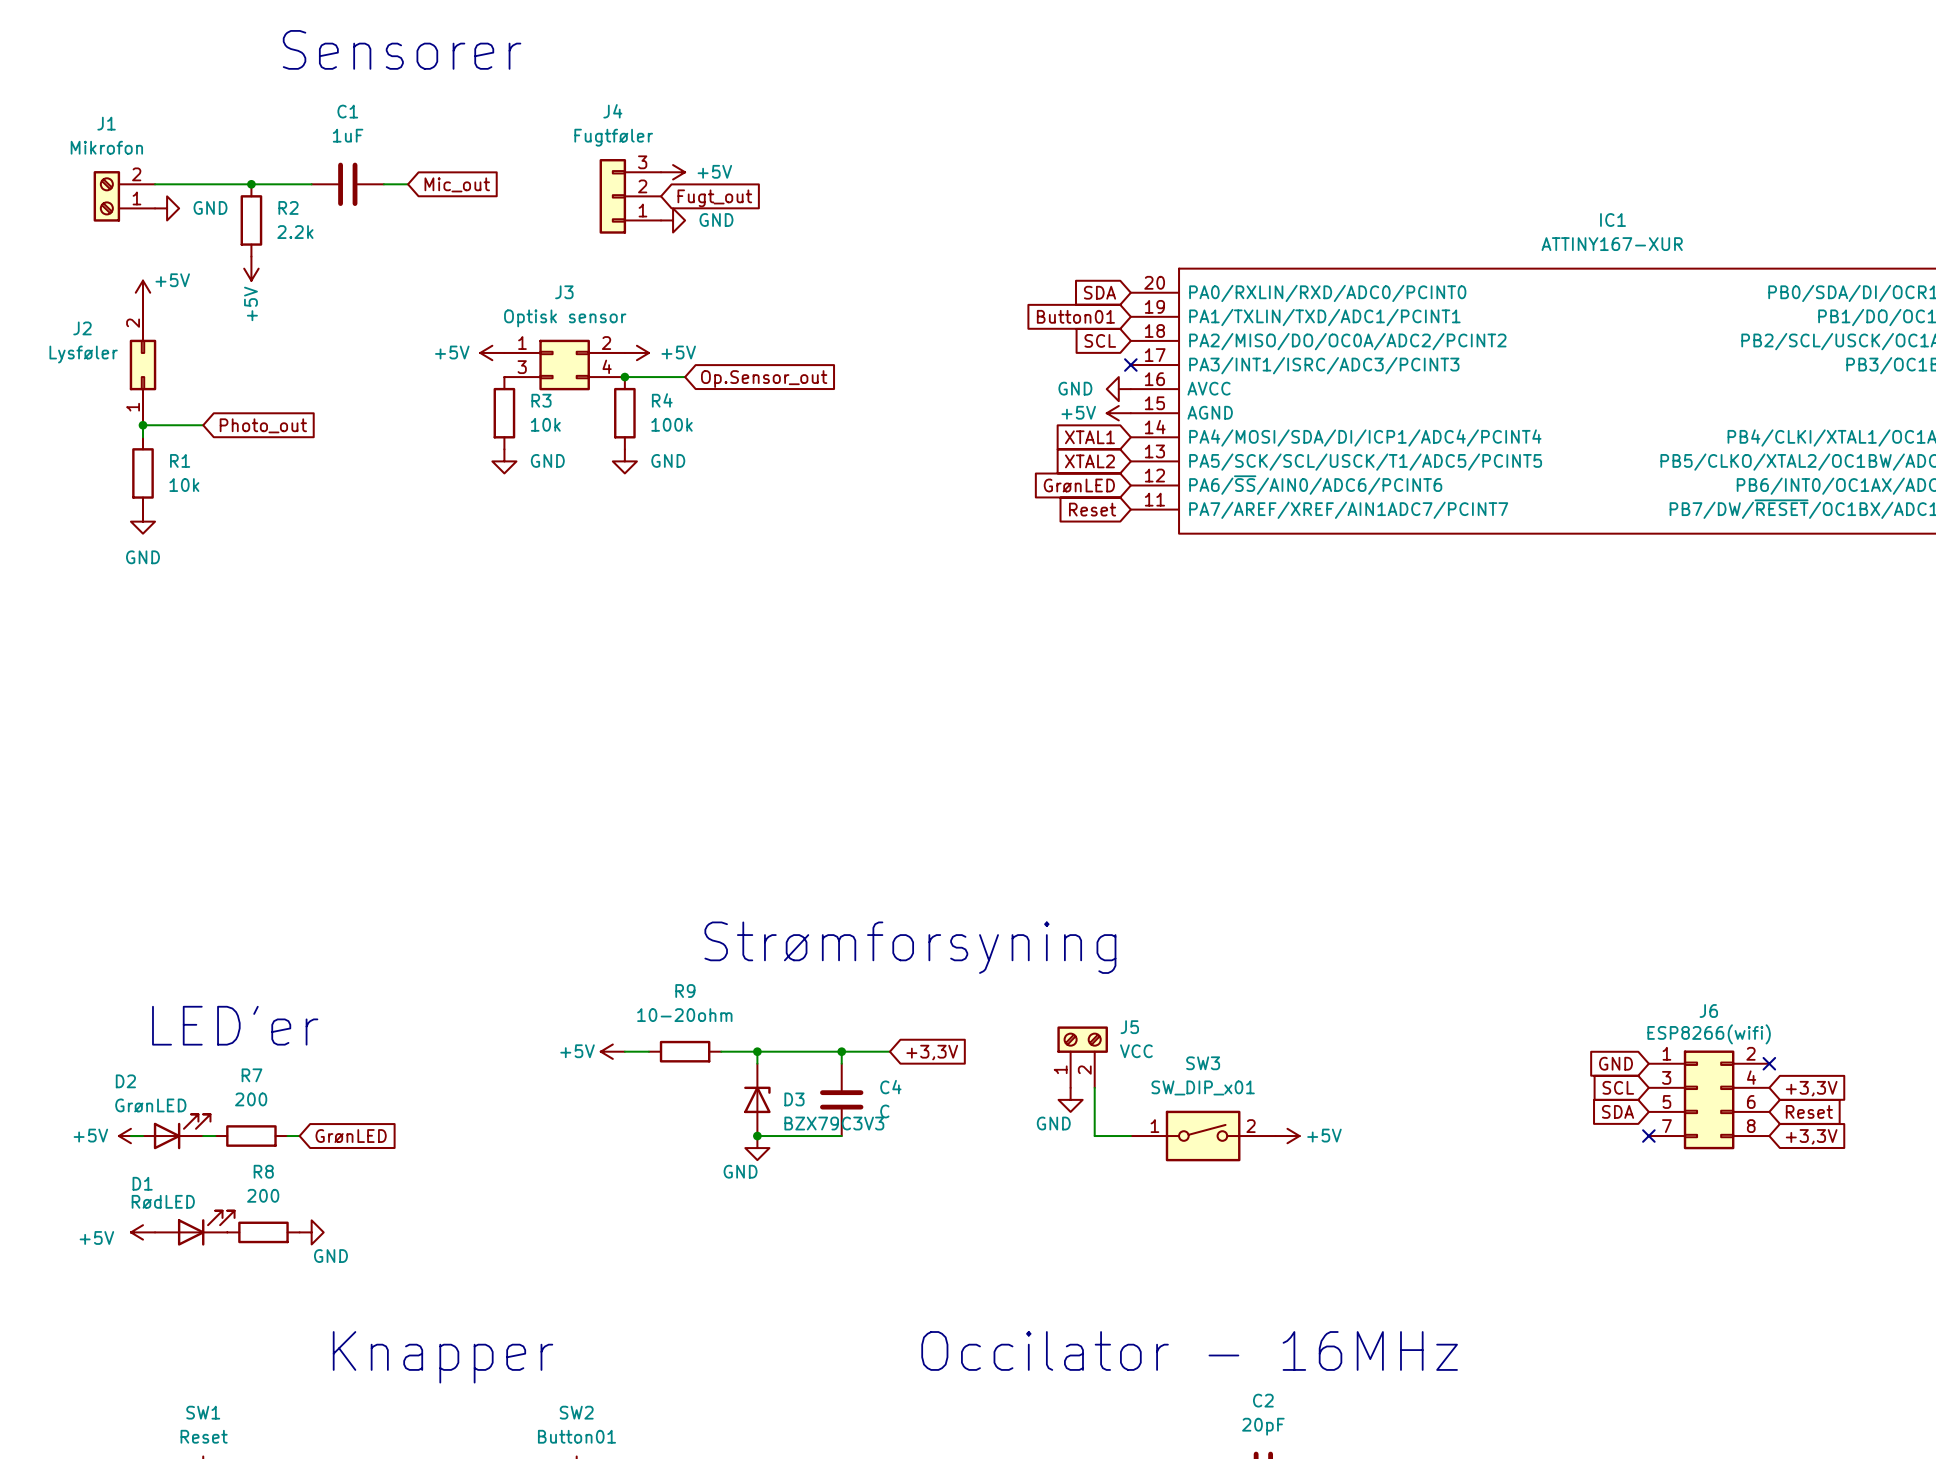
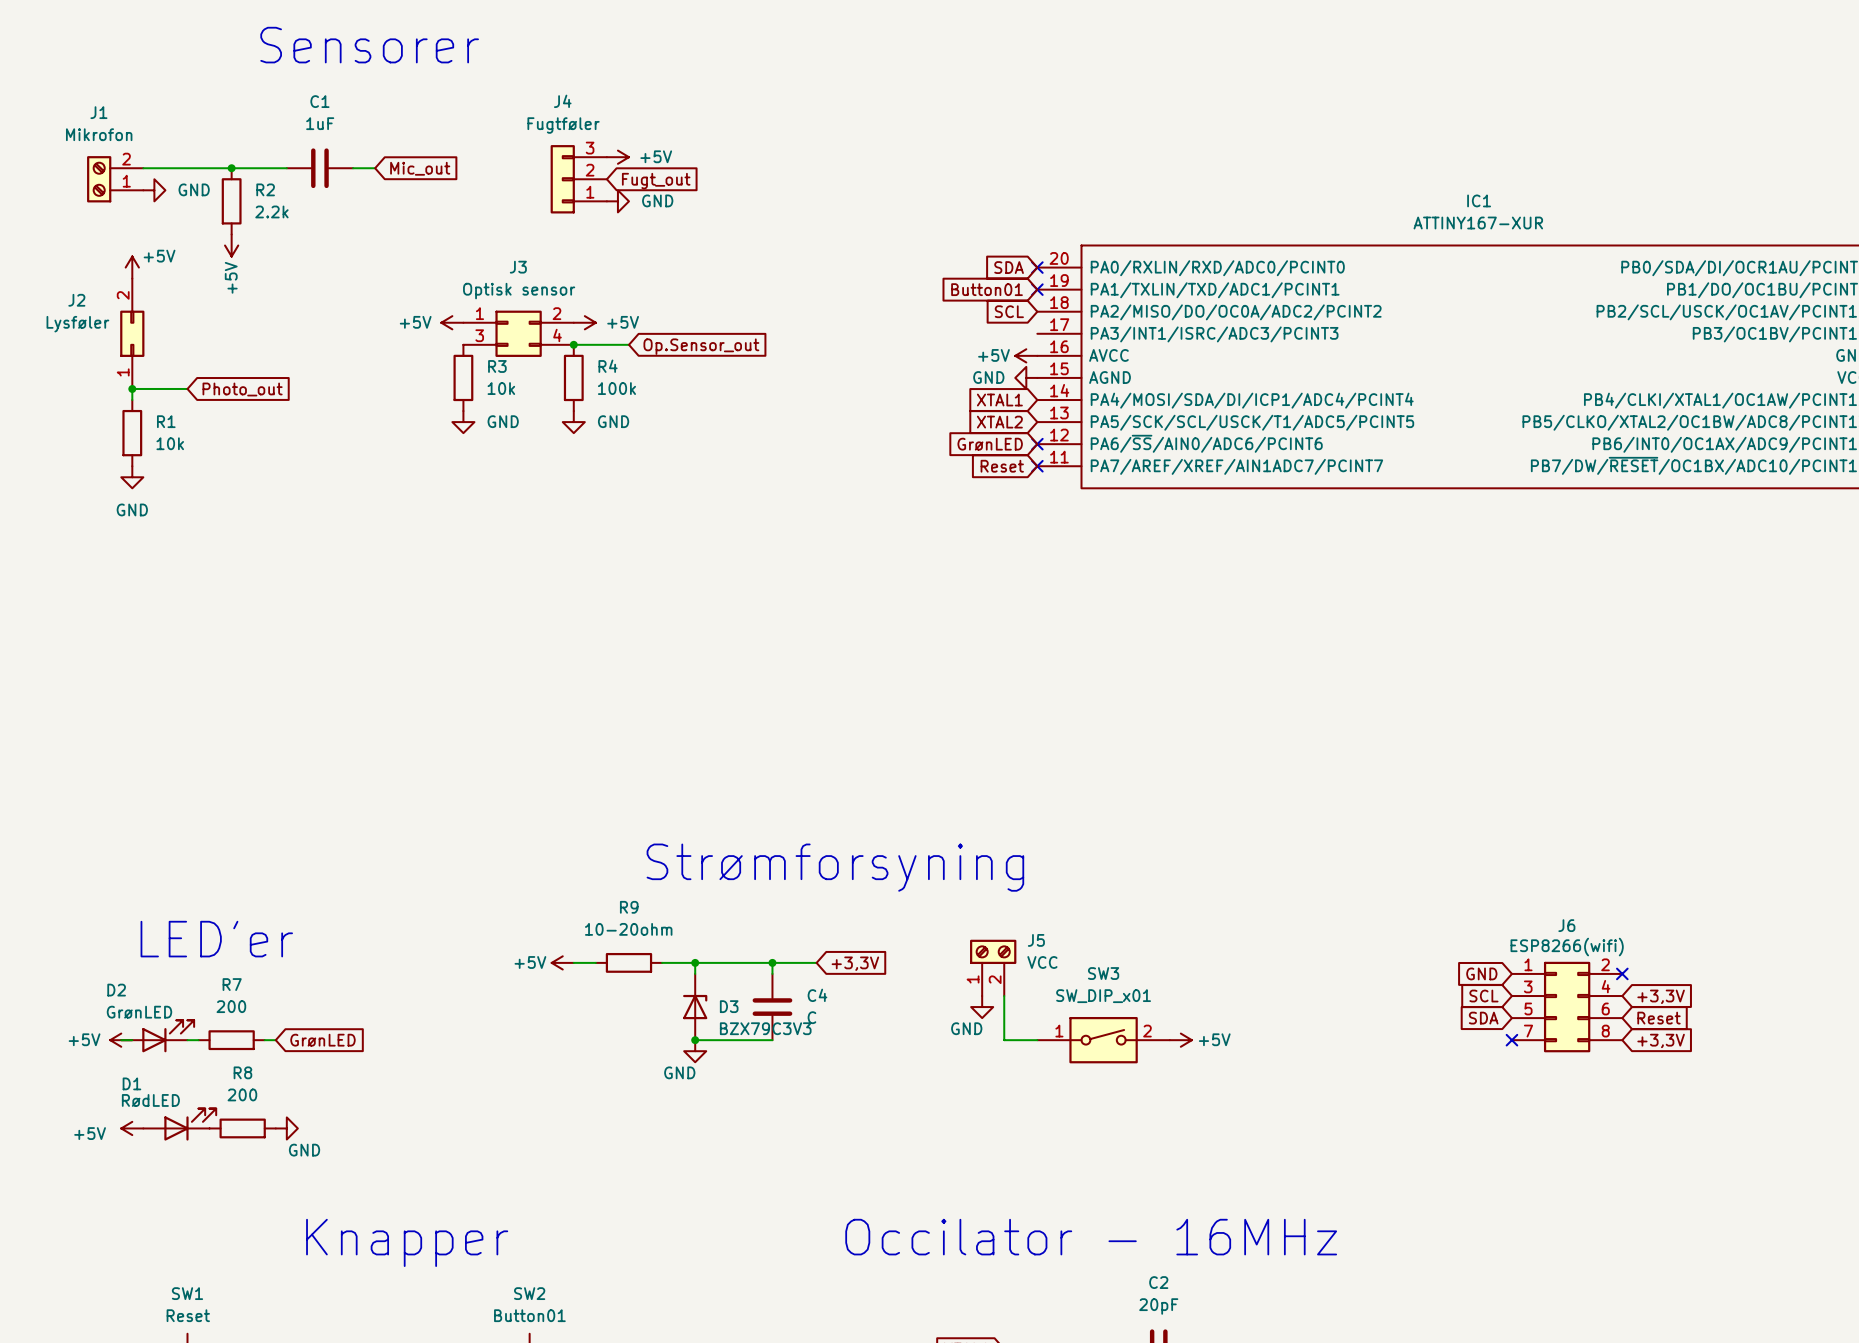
no-connect mark: none -> (1037, 267)
no-connect mark: none -> (1037, 289)
no-connect mark: (1130, 365) -> none
power symbol: GND (1118, 389) -> +5V (1026, 355)
power symbol: +5V (1118, 413) -> GND (1026, 377)
no-connect mark: none -> (1037, 444)
no-connect mark: none -> (1037, 466)

